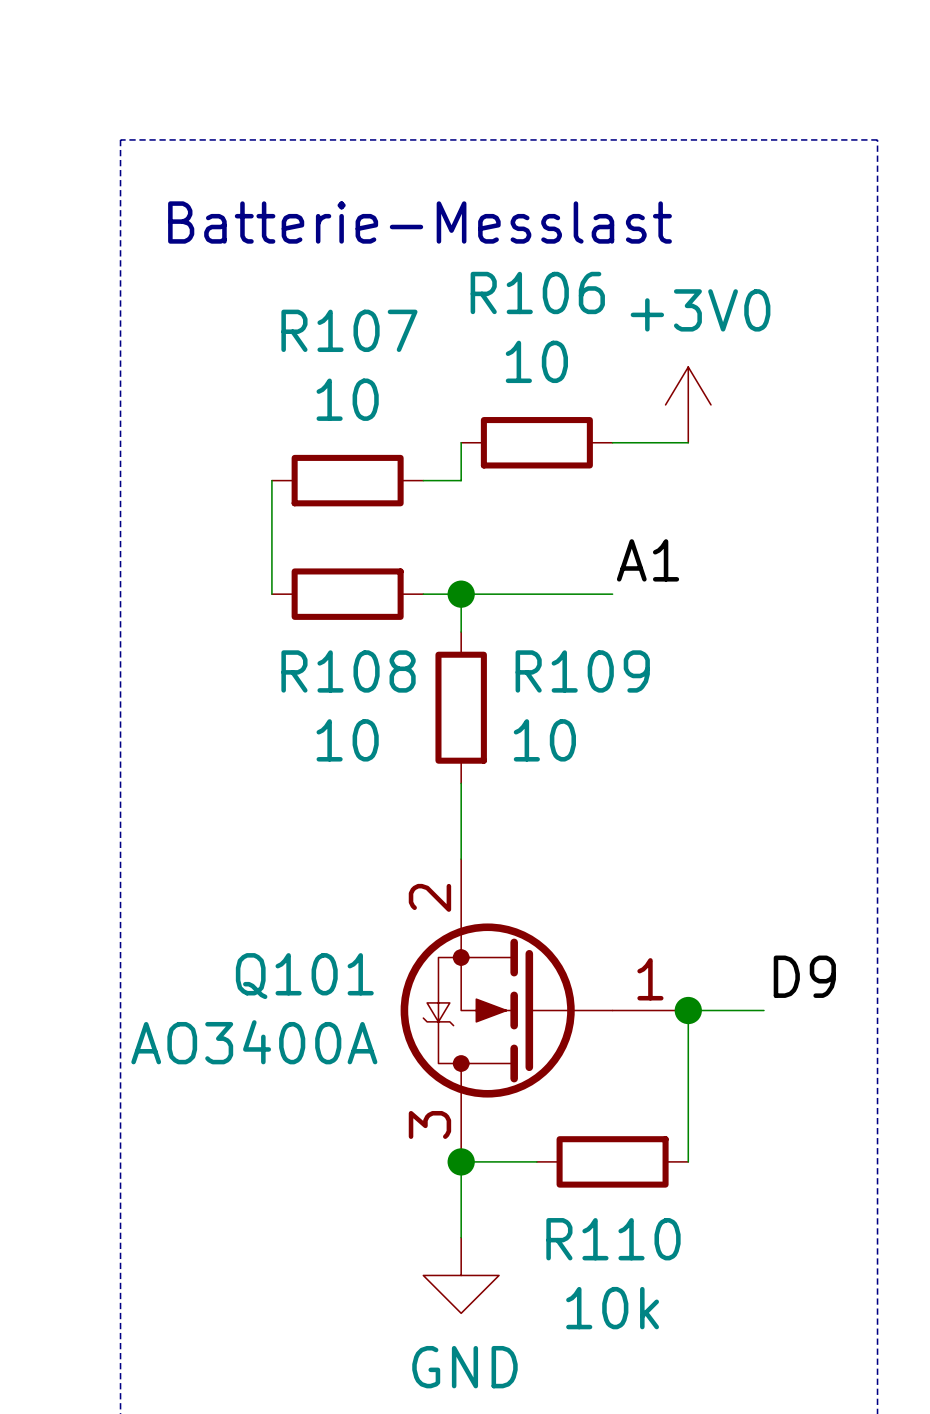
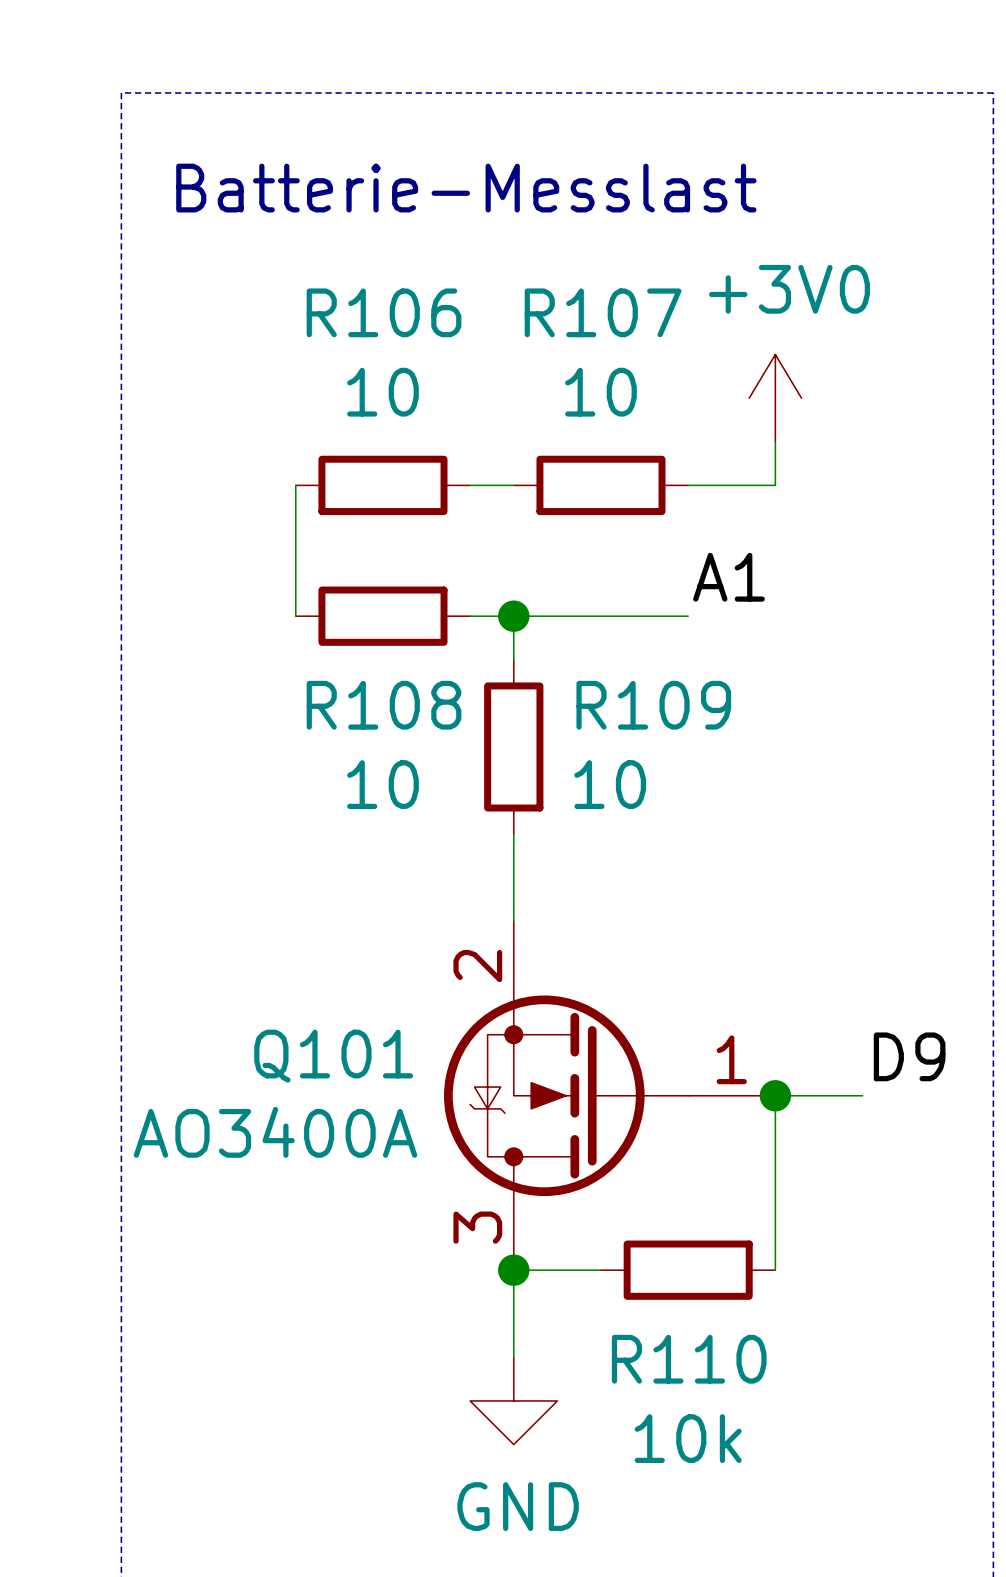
R107 name: R107 (349, 330) -> R106 (384, 312)
wire: (461, 442) (461, 480) -> none
R106: 10 (536, 442) -> none
wire: (612, 442) (688, 442) -> (688, 485) (775, 485) (775, 441)
R107: none -> 10 (600, 485)

